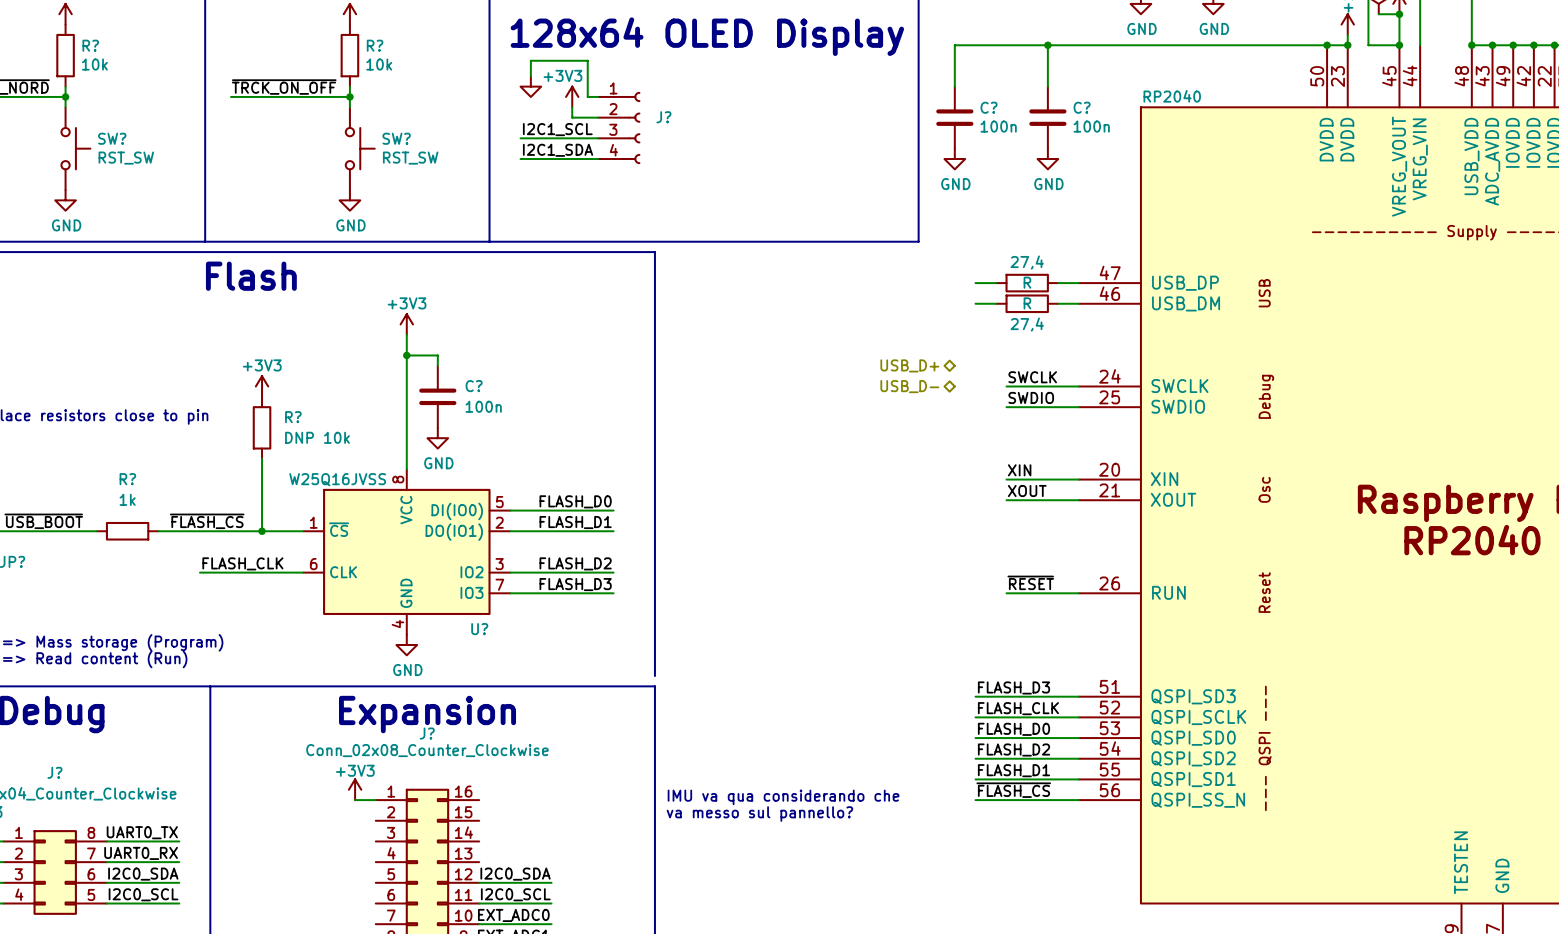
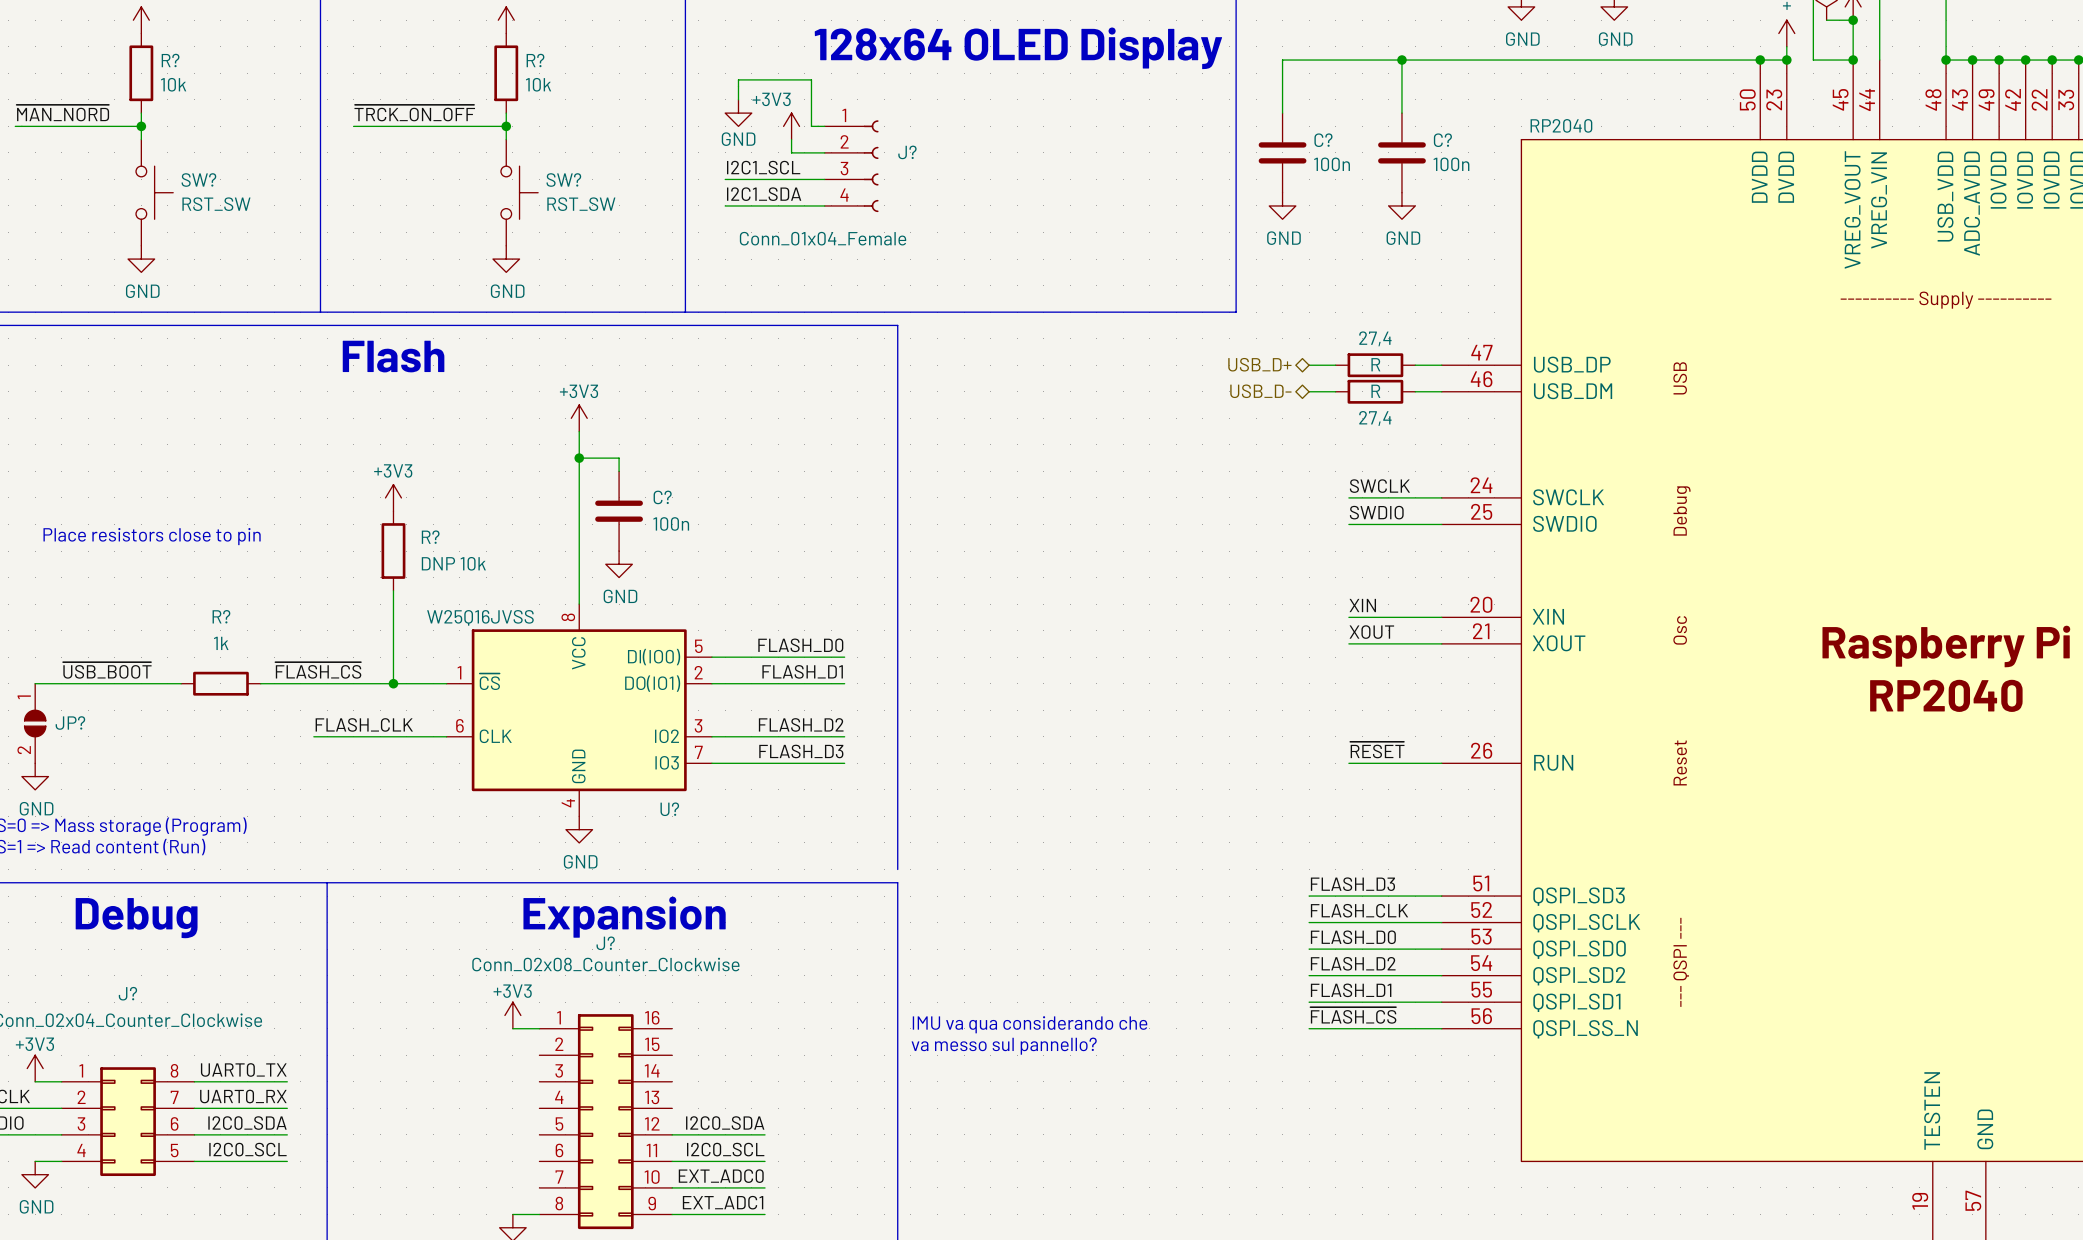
power symbol text: none -> GND (738, 139)
J? value: none -> Conn_01x04_Female (823, 238)
hierarchical label position: USB_D+ (909, 365) -> USB_D+ (1259, 364)
hierarchical label position: USB_D- (909, 386) -> USB_D- (1260, 391)

